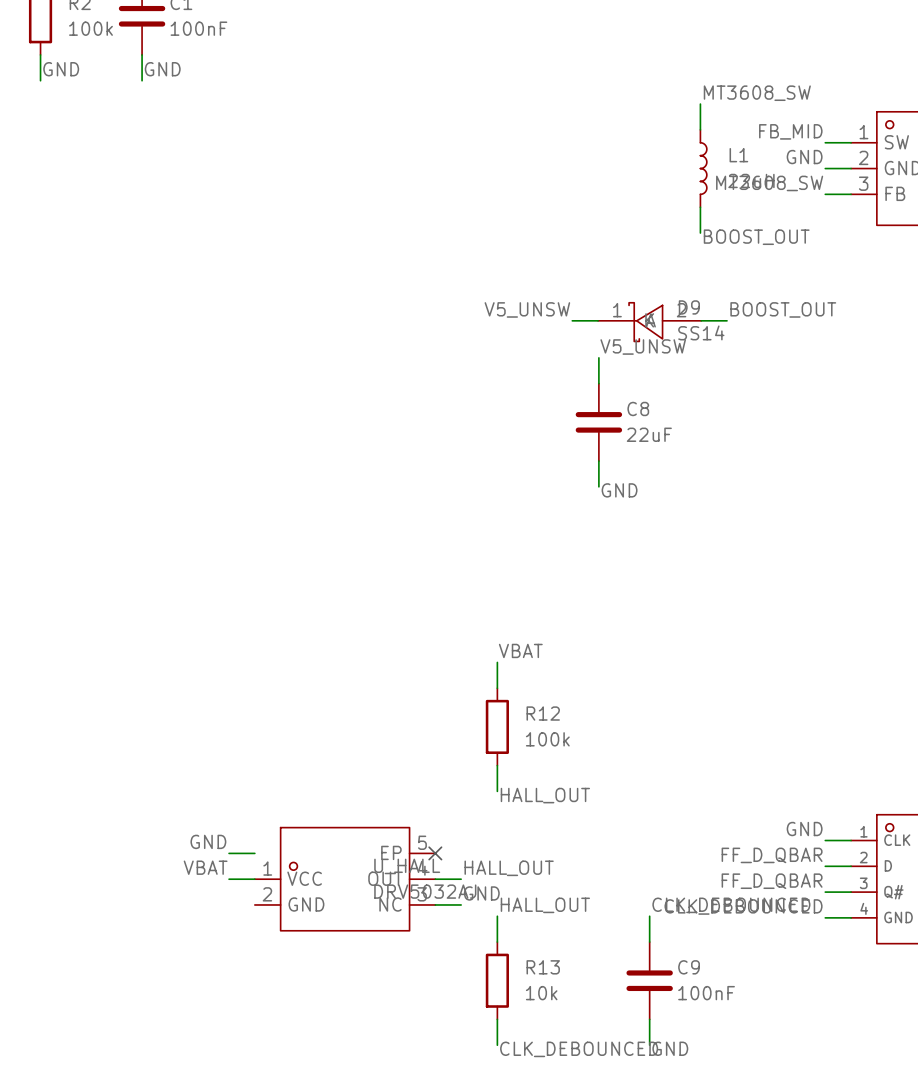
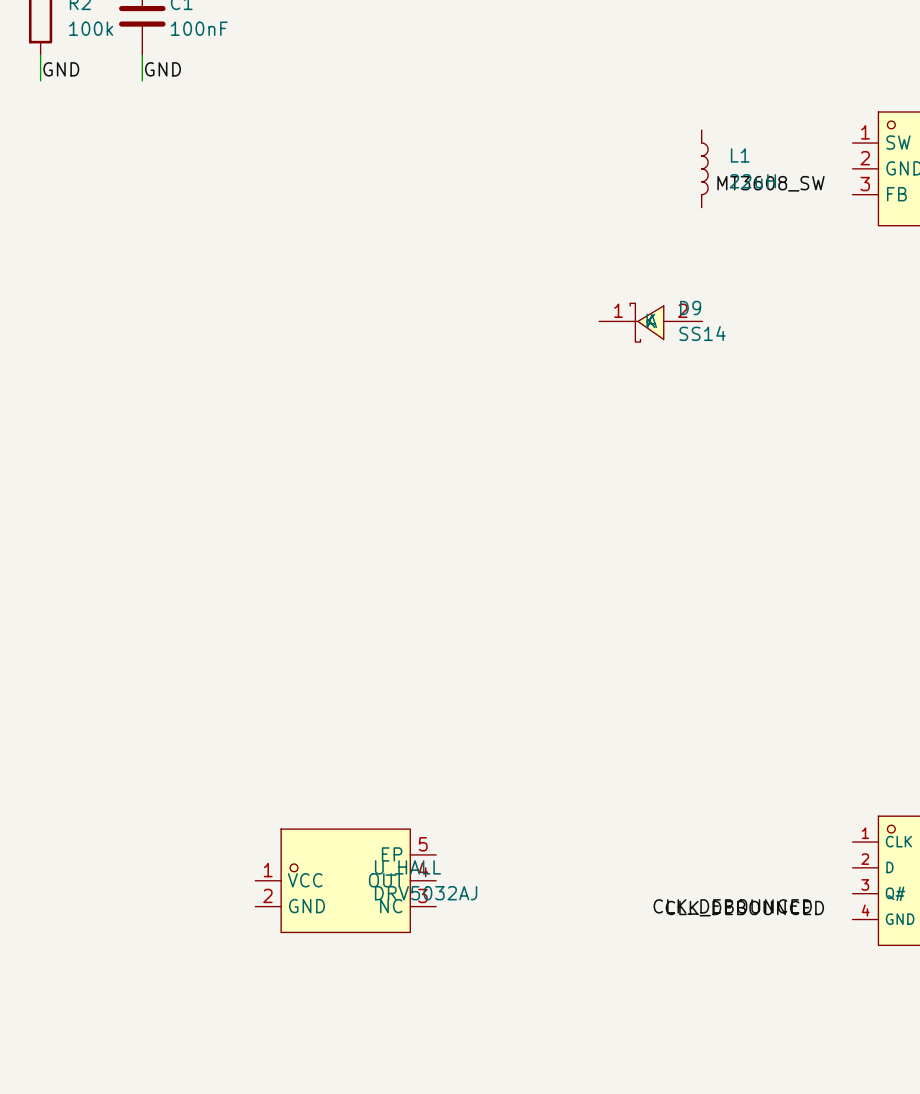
label: MT3608_SW (757, 93) -> none
wire: (700, 104) (700, 129) -> none
label: FB_MID (790, 131) -> none
wire: (825, 142) (851, 142) -> none
label: GND (804, 157) -> none
wire: (825, 168) (851, 168) -> none
wire: (825, 194) (851, 194) -> none
wire: (700, 207) (700, 233) -> none
label: BOOST_OUT (756, 237) -> none
label: V5_UNSW (527, 309) -> none
label: BOOST_OUT (783, 309) -> none
wire: (572, 320) (598, 320) -> none
wire: (701, 320) (727, 320) -> none
label: V5_UNSW (643, 347) -> none
wire: (598, 357) (598, 383) -> none
C8: 22uF (598, 422) -> none
wire: (598, 461) (598, 486) -> none
label: GND (619, 490) -> none
label: VBAT (520, 650) -> none
wire: (497, 662) (497, 688) -> none
R12: 100k (497, 726) -> none
wire: (497, 765) (497, 791) -> none
label: HALL_OUT (545, 795) -> none
label: GND (804, 829) -> none
wire: (825, 840) (851, 840) -> none
label: GND (208, 841) -> none
wire: (229, 853) (254, 853) -> none
no-connect mark: (435, 853) -> none
label: FF_D_QBAR (772, 855) -> none
wire: (825, 866) (851, 866) -> none
label: VBAT (205, 867) -> none
label: HALL_OUT (509, 868) -> none
wire: (229, 879) (254, 879) -> none
wire: (435, 879) (461, 879) -> none
label: FF_D_QBAR (772, 881) -> none
wire: (825, 892) (851, 892) -> none
label: GND (481, 893) -> none
wire: (435, 904) (461, 904) -> none
label: HALL_OUT (545, 905) -> none
wire: (497, 916) (497, 942) -> none
wire: (649, 916) (649, 942) -> none
wire: (825, 917) (851, 917) -> none
R13: 10k (497, 980) -> none
C9: 100nF (649, 980) -> none
wire: (497, 1019) (497, 1045) -> none
wire: (649, 1019) (649, 1045) -> none
label: GND (670, 1048) -> none
label: CLK_DEBOUNCED (579, 1049) -> none

